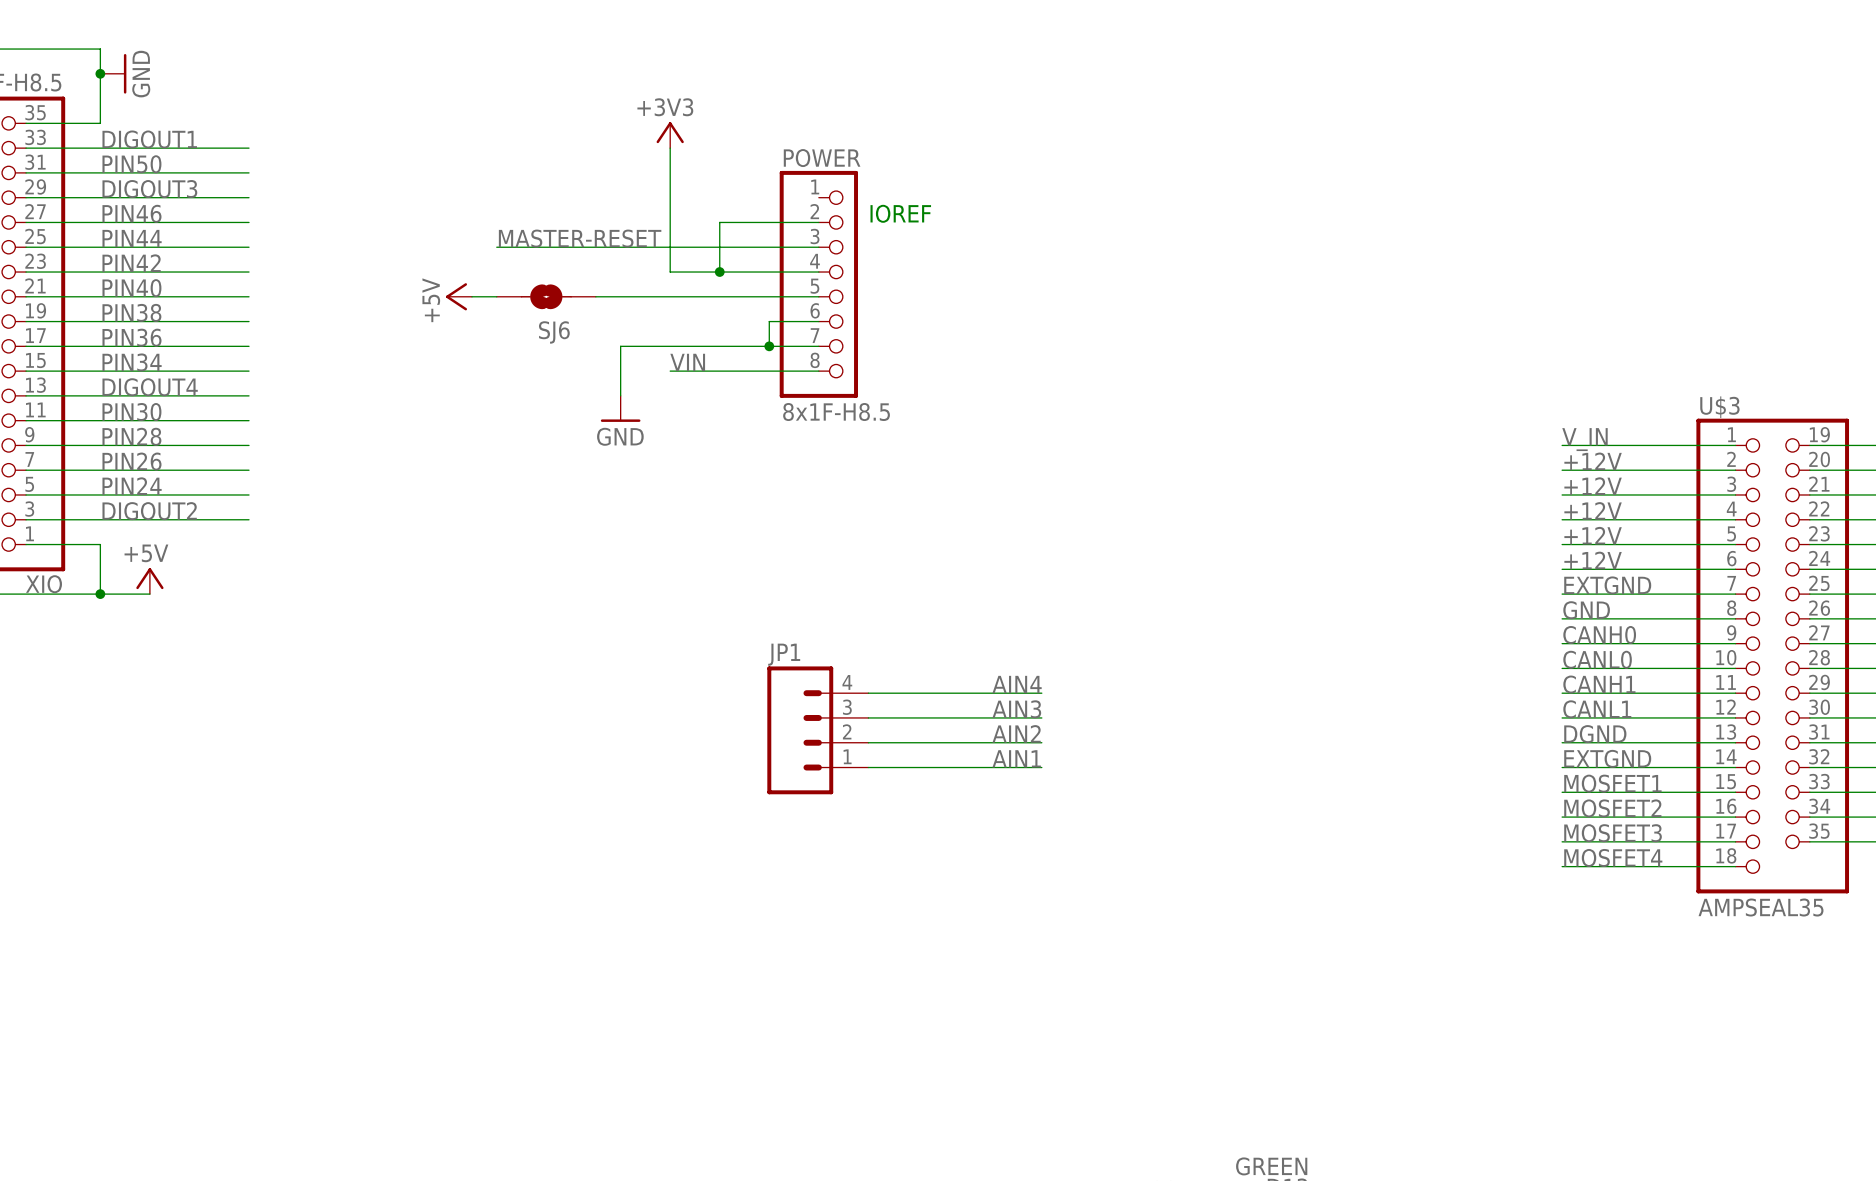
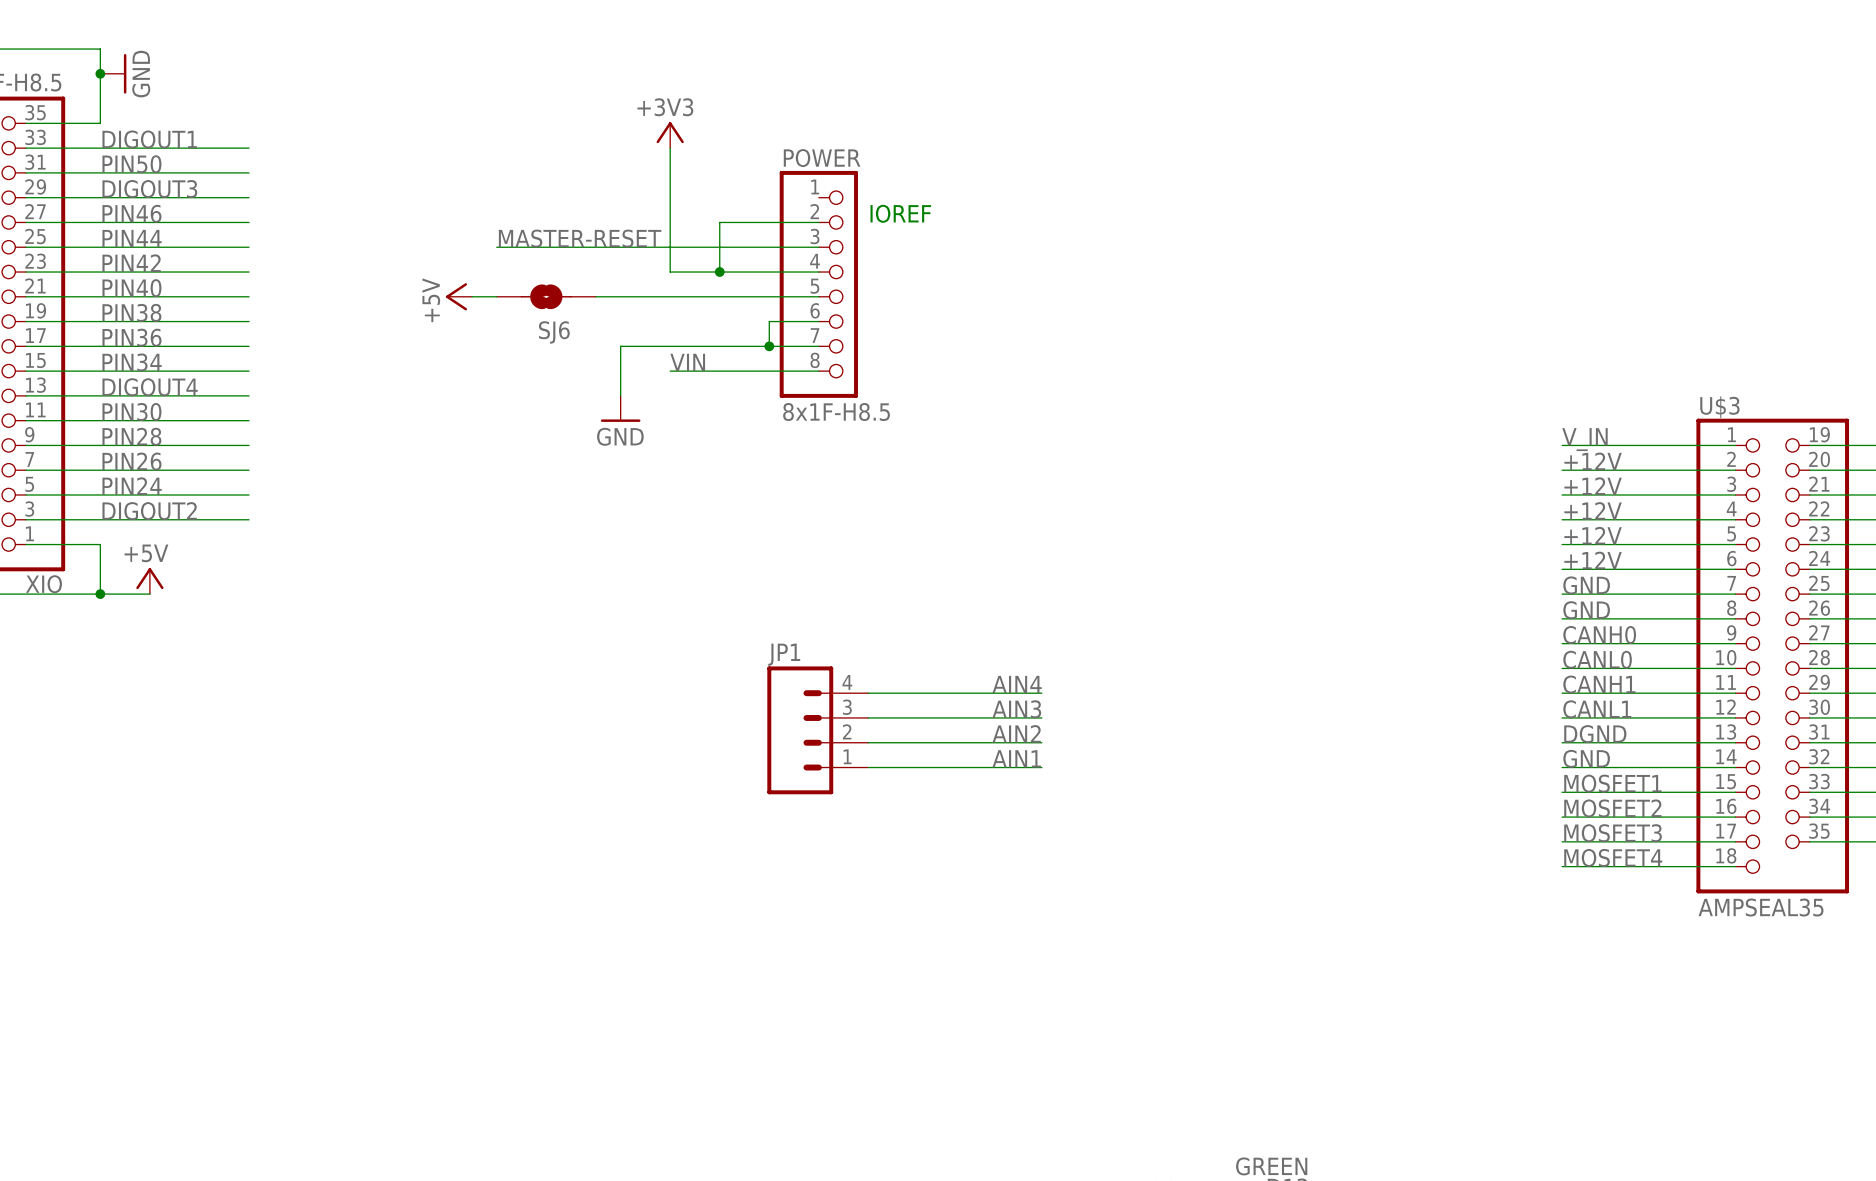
label: EXTGND (1607, 585) -> GND (1586, 585)
label: EXTGND (1607, 758) -> GND (1586, 758)

